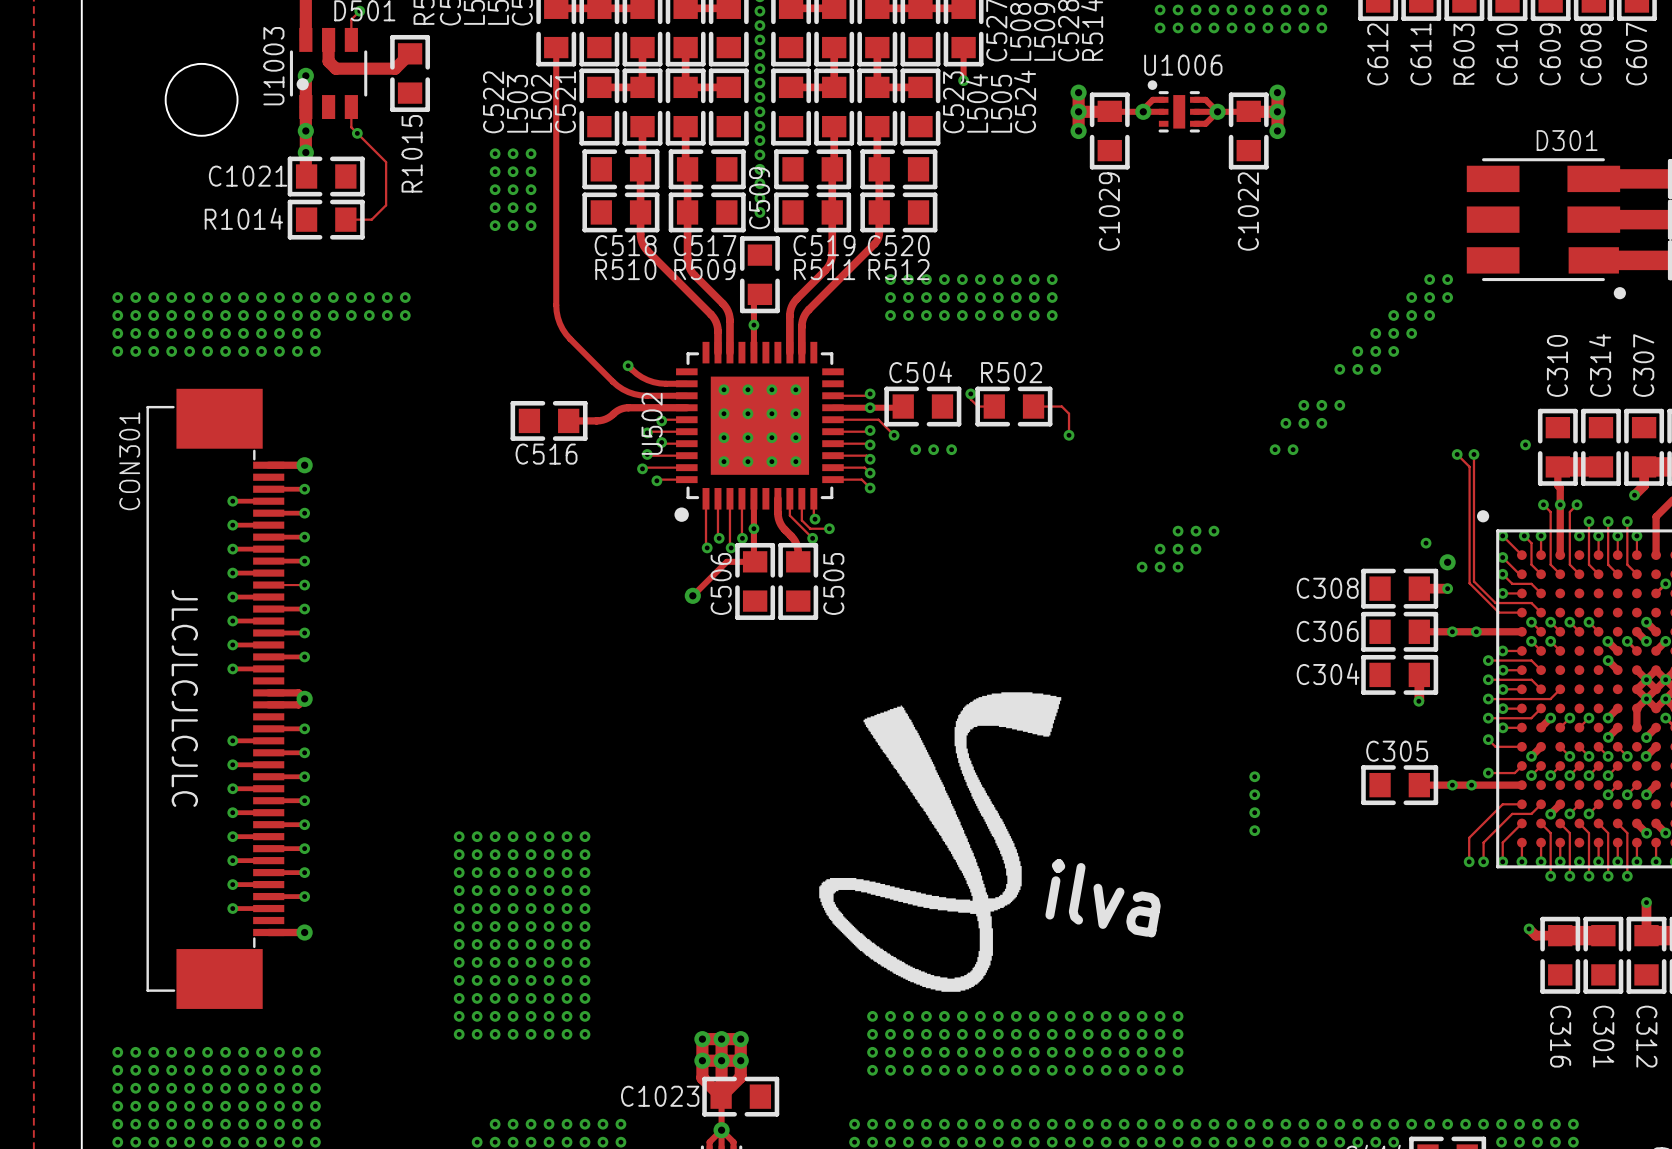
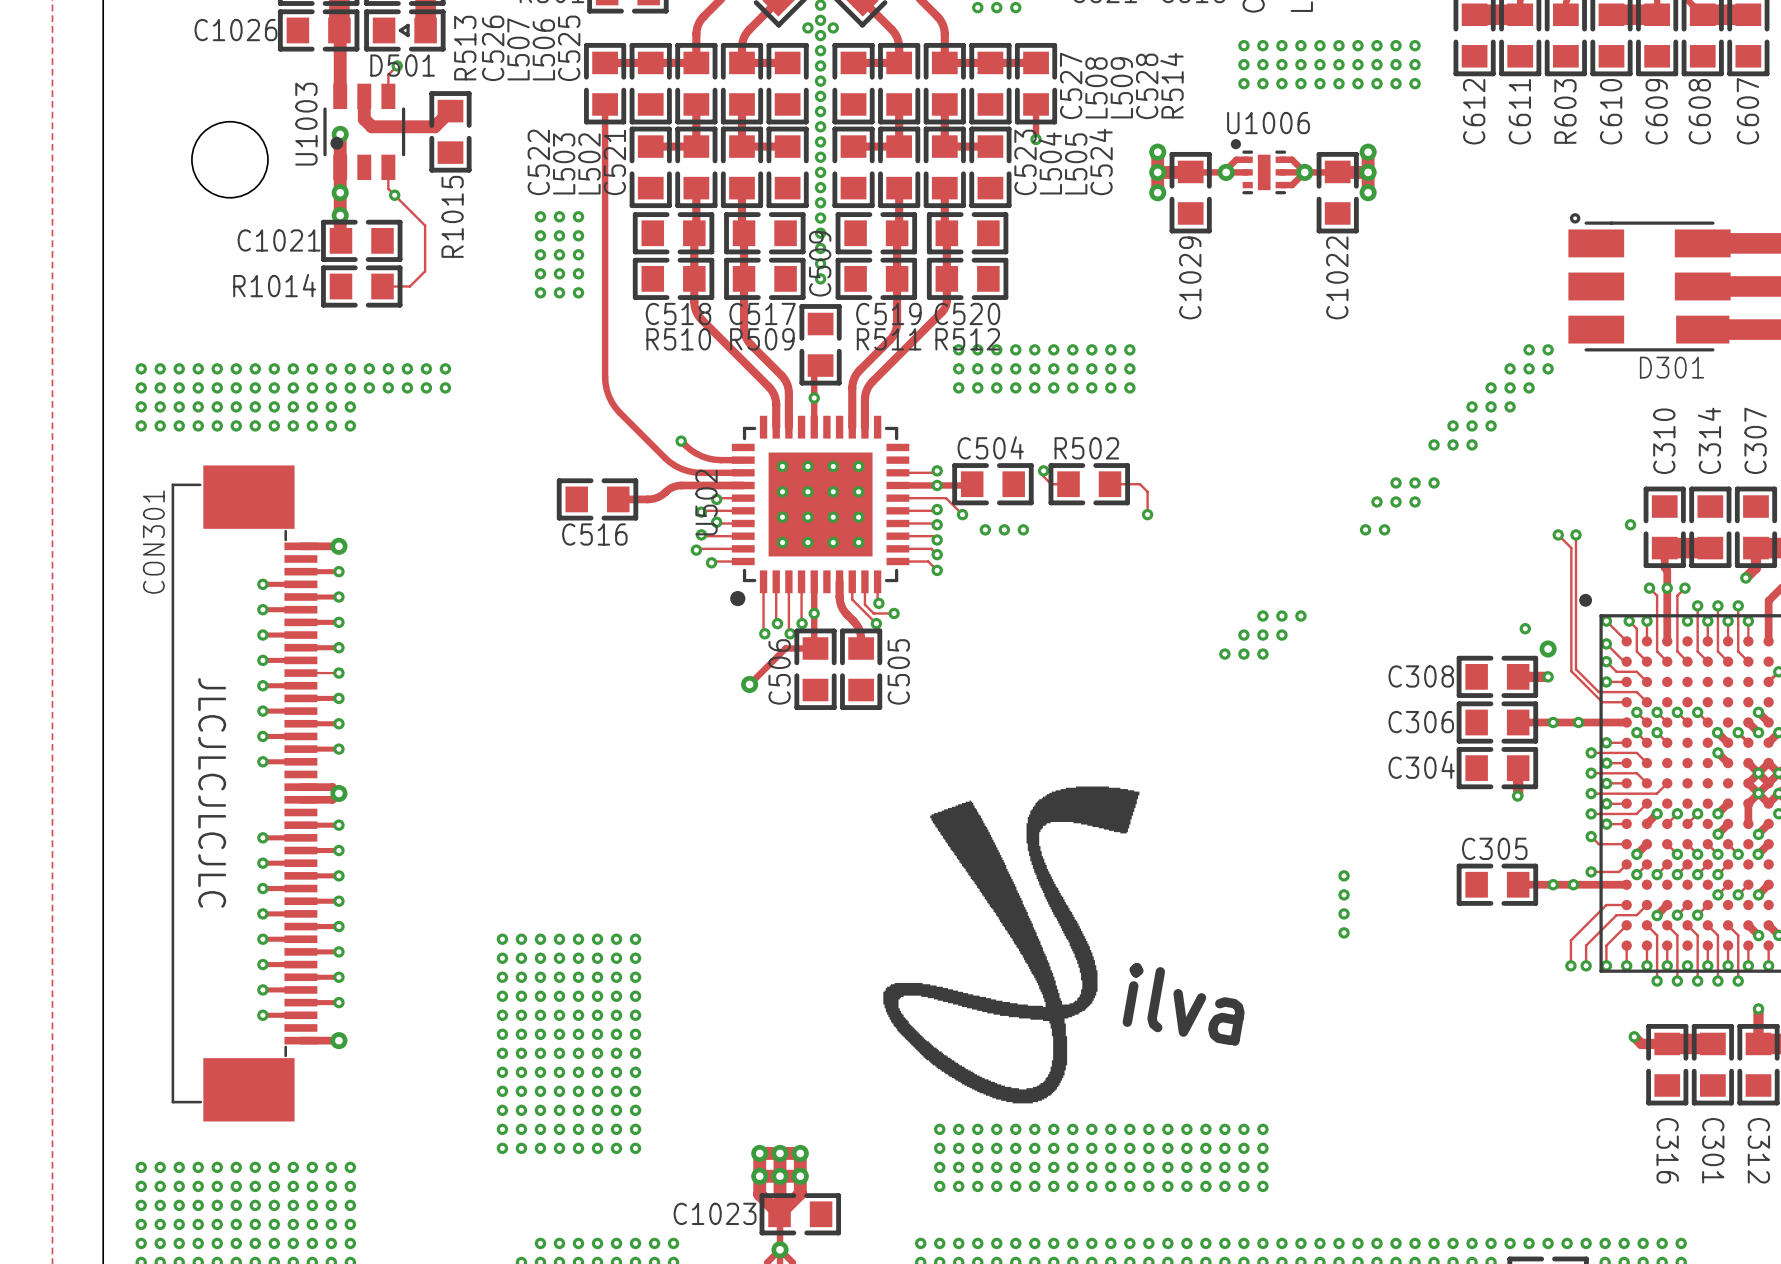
D301 name position: D301 (1567, 140) -> D301 (1671, 367)
D301 footprint: [1466, 158, 1626, 300] -> [1568, 213, 1731, 352]

